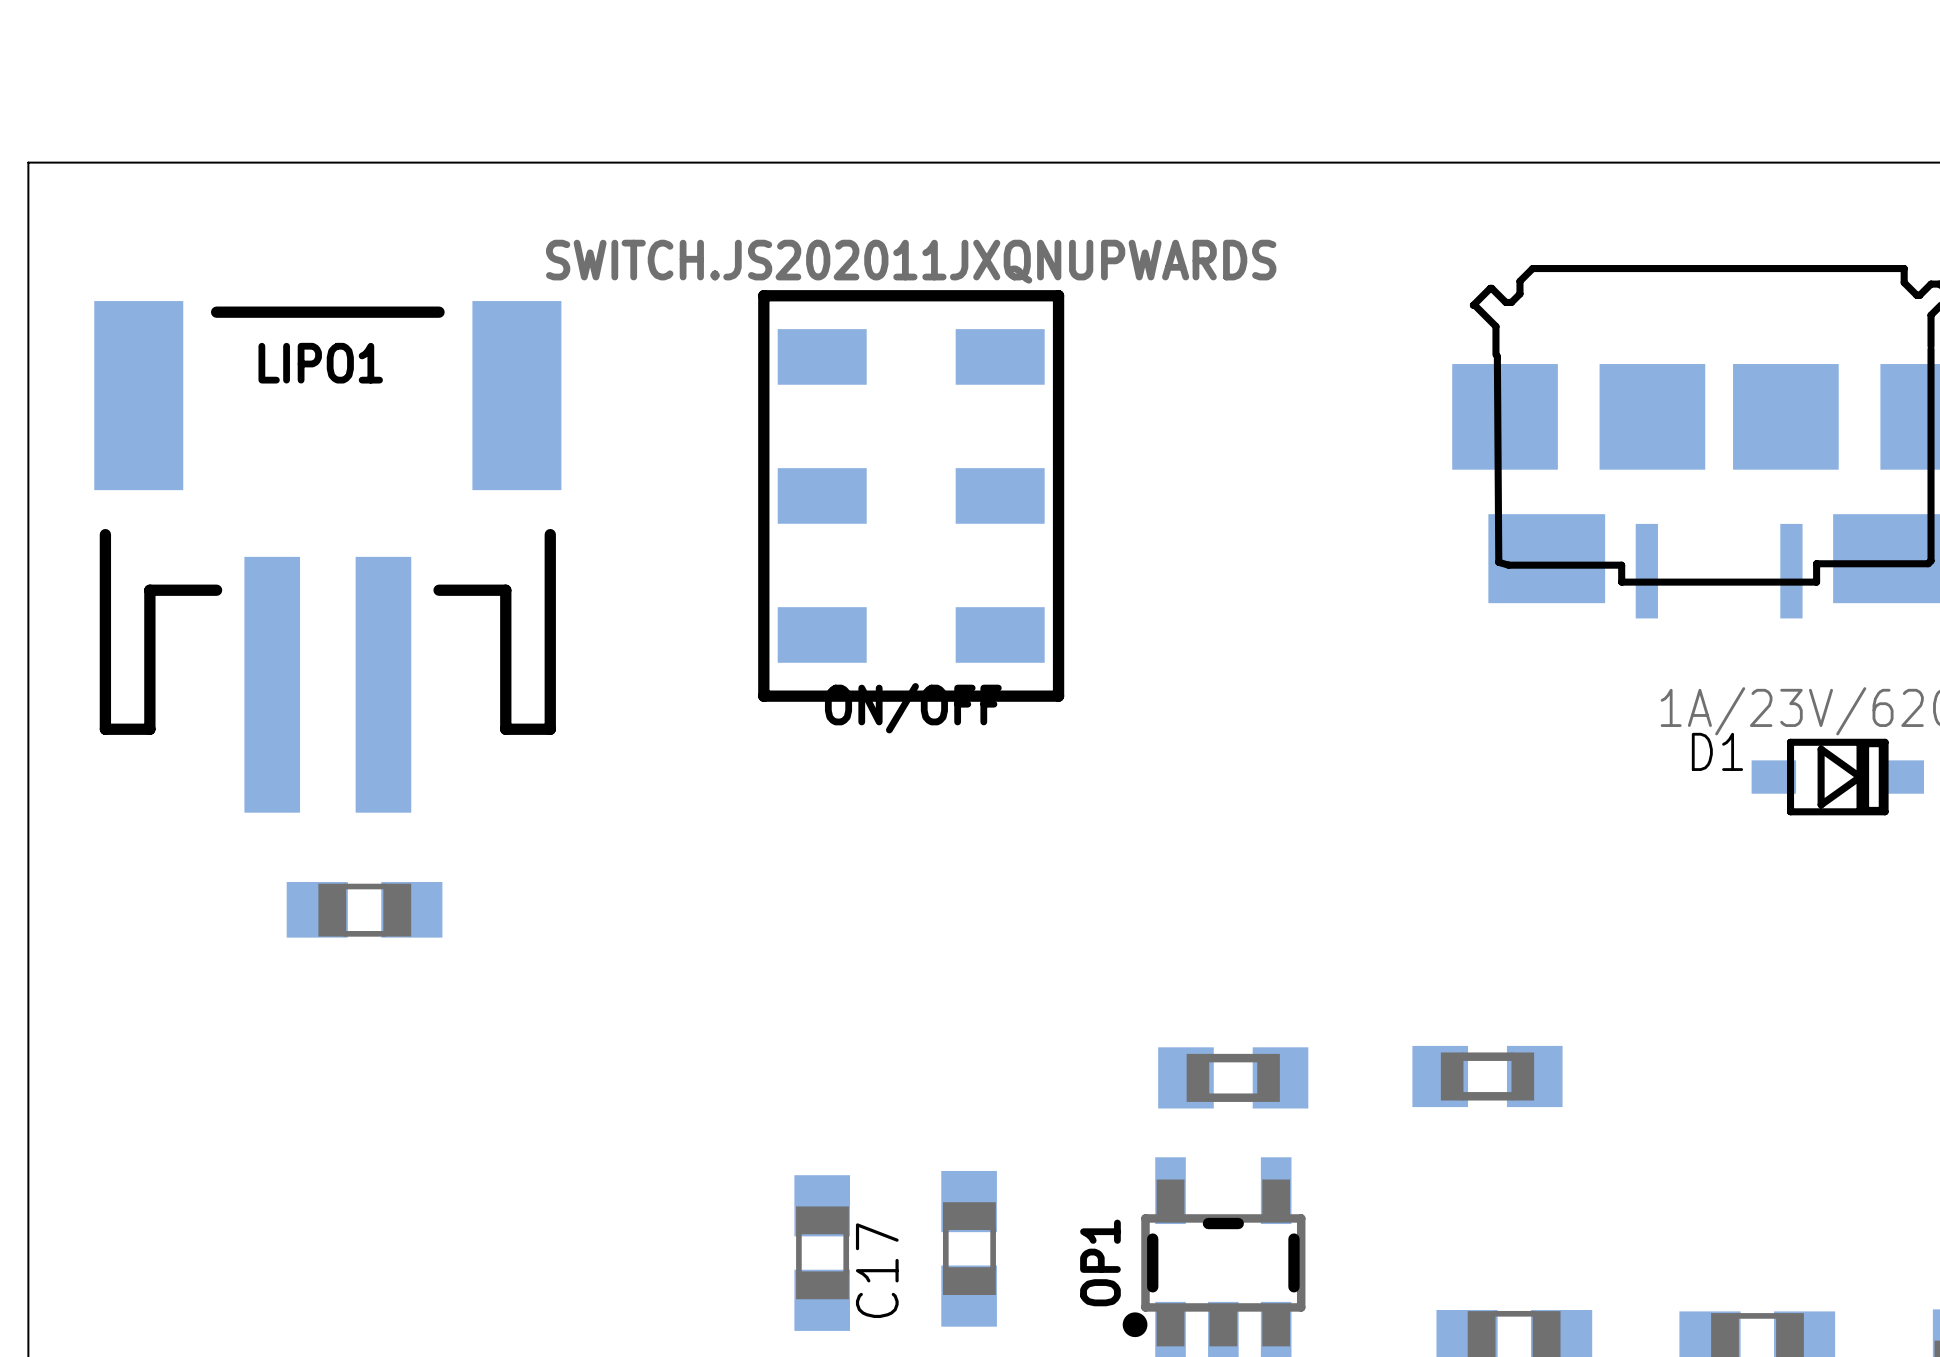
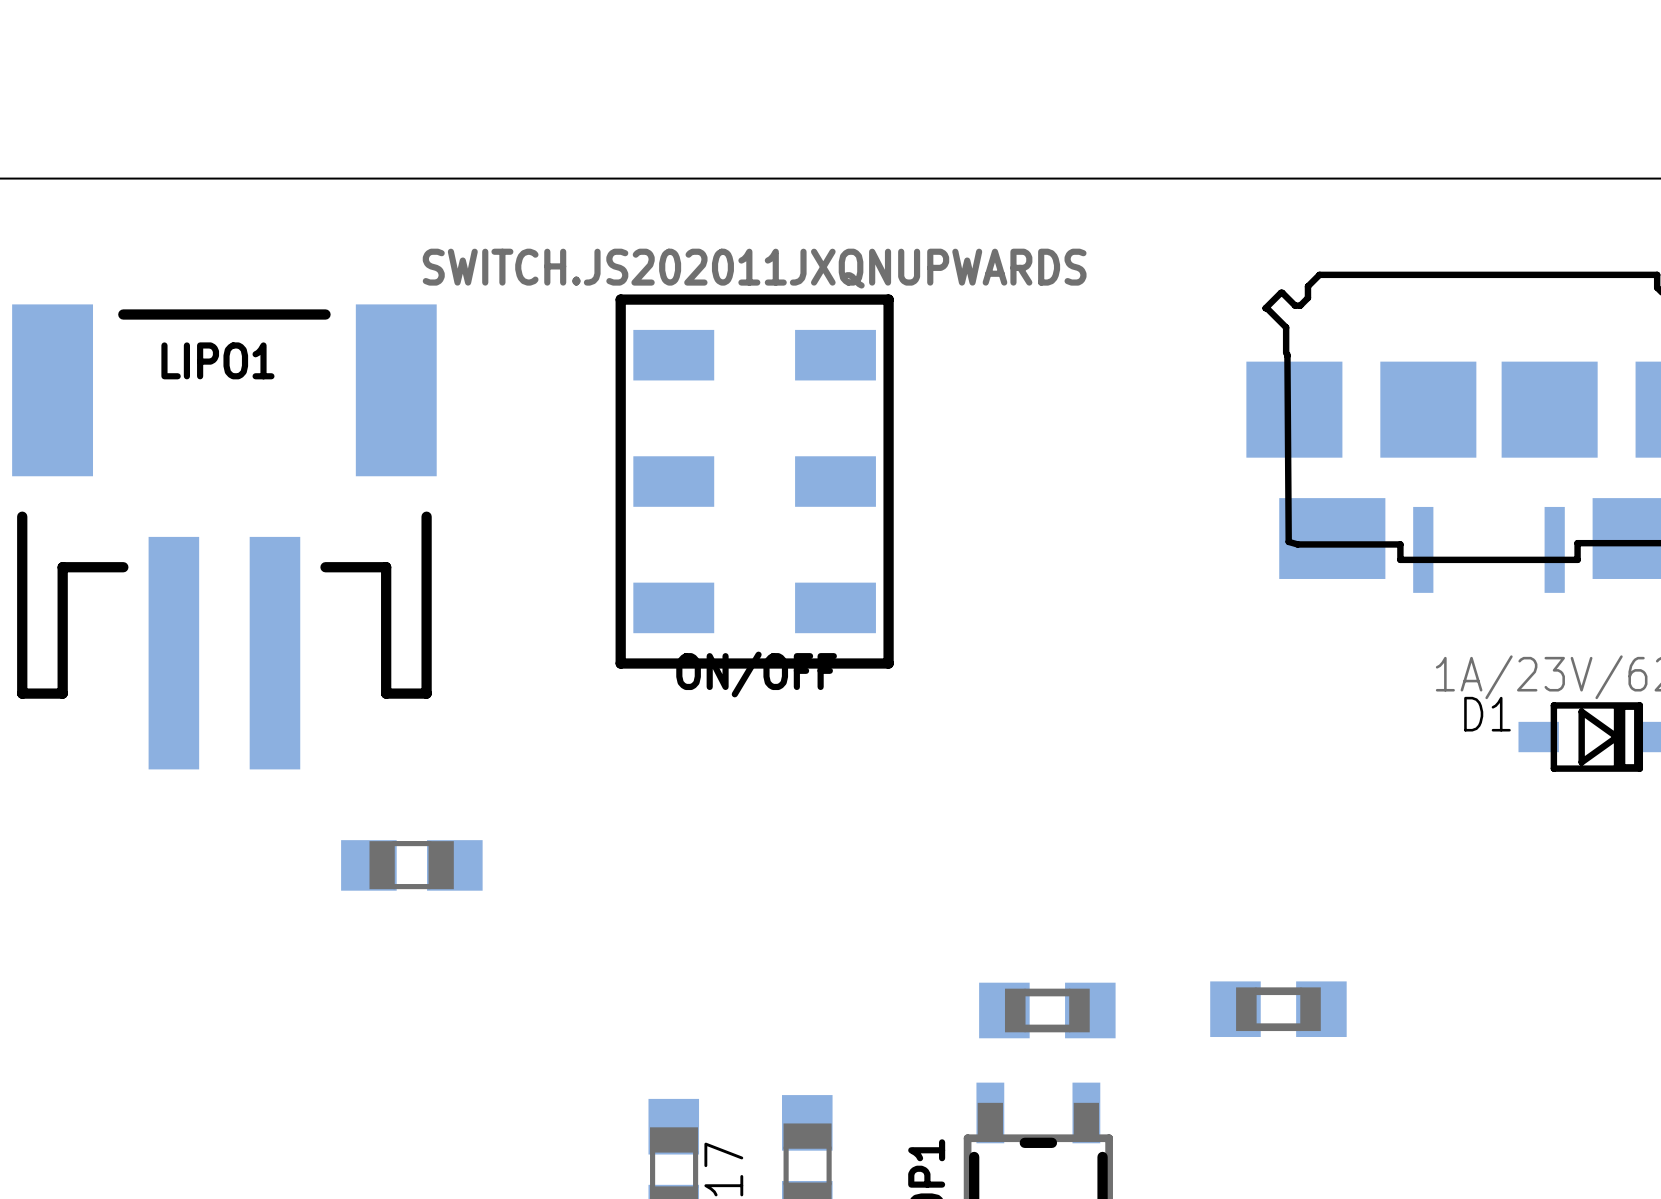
part position: (364, 909) -> (411, 865)

